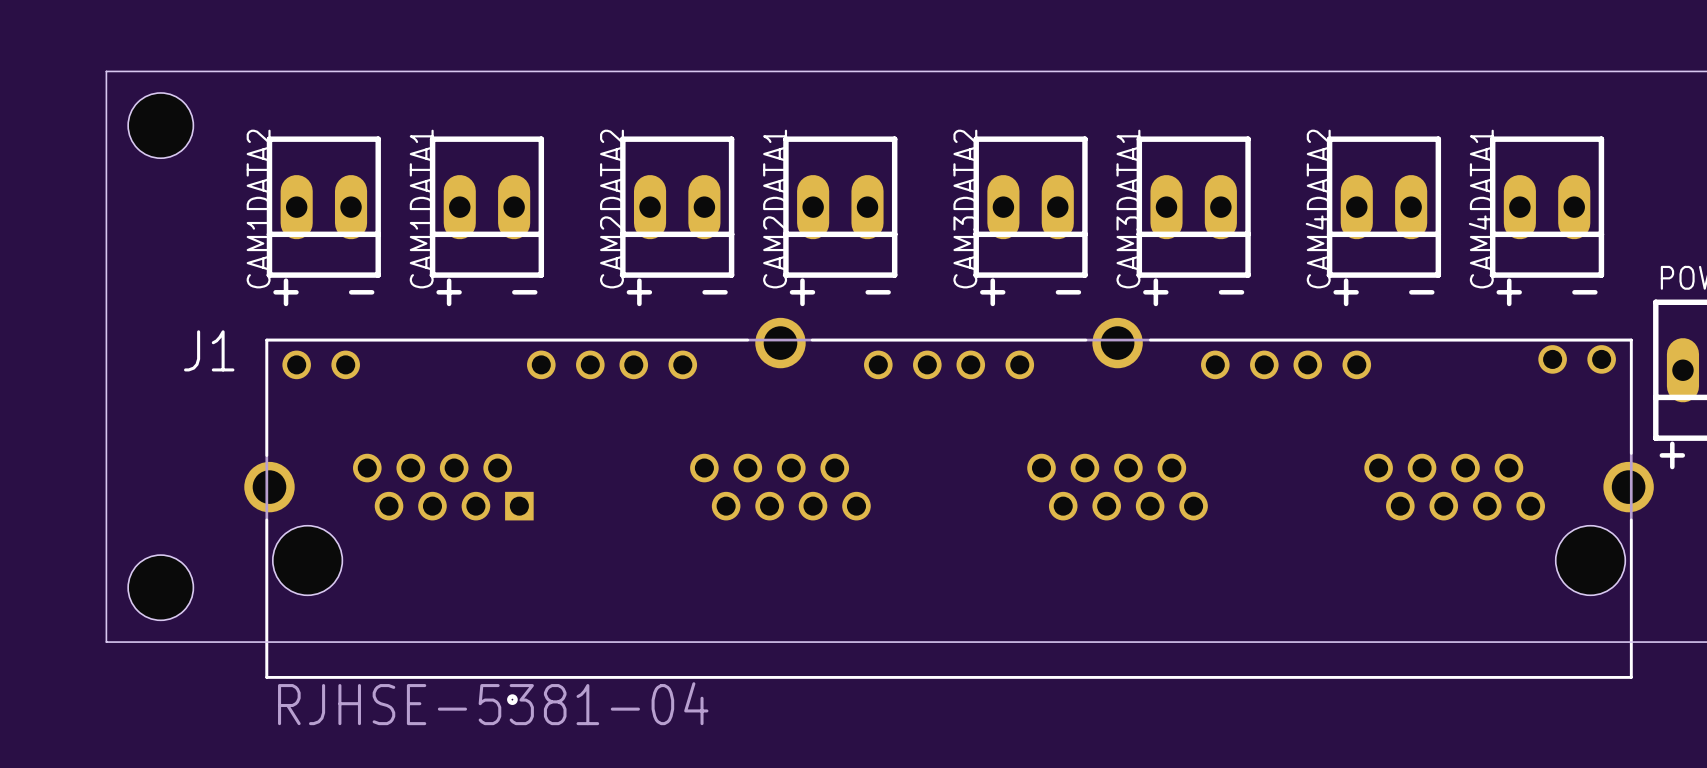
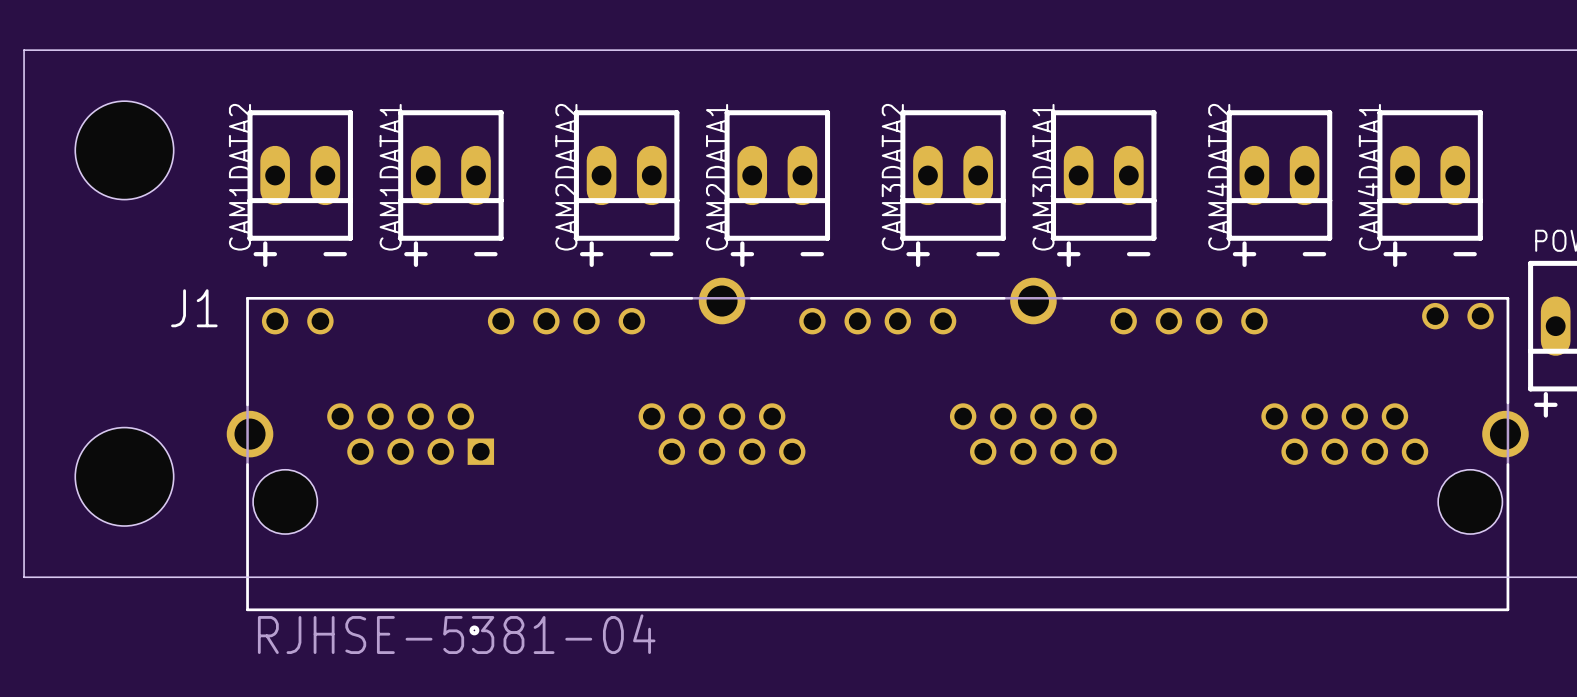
board edge: (106, 71) (106, 642) -> (99, 50) (24, 50) (24, 577) (99, 577)
hole: (160, 125) -> none
hole: none -> (124, 150)
hole: none -> (124, 476)
hole: (160, 587) -> none

